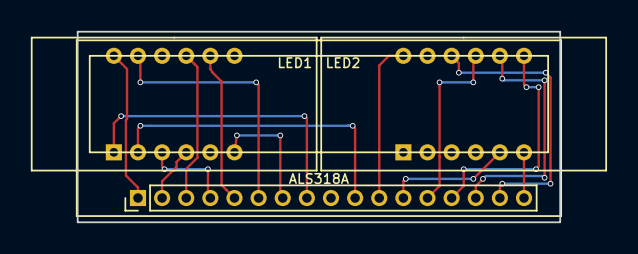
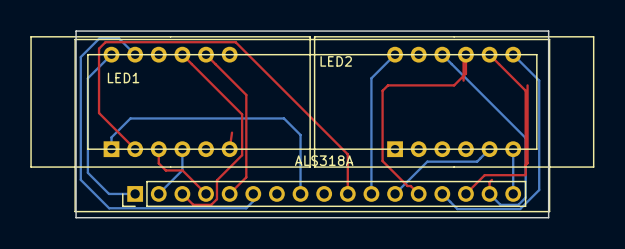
top track: (113, 55) (127, 68) (125, 175) (137, 187) (137, 198) -> none
bottom track: none -> (111, 54) (87, 78) (87, 172) (109, 193) (135, 193)
top track: (137, 55) (140, 58) (140, 82) -> none
bottom track: none -> (135, 54) (118, 38) (99, 38) (80, 57) (80, 179) (109, 208) (246, 208) (253, 201) (253, 193)
top track: (210, 55) (210, 69) (221, 81) (221, 184) -> (193, 65) (242, 114) (242, 155) (216, 180)
top track: none -> (206, 54) (246, 94) (246, 177) (232, 191)
top track: (403, 55) (388, 55) (379, 65) (379, 198) -> none
bottom track: none -> (395, 54) (371, 78) (371, 193)
top track: (451, 55) (458, 63) (458, 72) -> none
bottom track: none -> (442, 54) (525, 138) (525, 197) (518, 204) (500, 204) (489, 193)
top track: (524, 55) (524, 84) (526, 87) -> none
bottom track: none -> (513, 54) (539, 80) (539, 190) (520, 209) (457, 209) (442, 193)
top track: (502, 58) (502, 78) -> none
LED1 name position: LED1 (295, 62) -> LED1 (123, 77)
top track: (197, 66) (197, 157) (186, 168) (186, 198) -> none
bottom track: (458, 72) (545, 72) -> none
via: (458, 72) -> none
top track: (545, 72) (550, 77) (550, 183) -> none
via: (545, 72) -> none
bottom track: (502, 78) (503, 80) (544, 80) -> none
via: (502, 78) -> none
top track: (544, 80) (544, 177) -> none
via: (544, 80) -> none
bottom track: (140, 82) (256, 82) -> none
via: (140, 82) -> none
top track: (256, 82) (258, 84) (258, 198) -> none
via: (256, 82) -> none
top track: (439, 82) (439, 185) (427, 198) -> (465, 54) (465, 73) (454, 85) (387, 85) (382, 90) (382, 161) (407, 186) (410, 186) (418, 193)
bottom track: (439, 82) (473, 82) -> none
via: (439, 82) -> none
via: (473, 82) -> none
bottom track: (526, 87) (538, 87) -> none
via: (526, 87) -> none
via: (538, 87) -> none
top track: (121, 116) (113, 123) (113, 152) -> none
bottom track: (121, 116) (304, 116) -> none
via: (121, 116) -> none
top track: (304, 116) (306, 118) (306, 198) -> none
via: (304, 116) -> none
top track: (140, 125) (137, 128) (137, 152) -> none
bottom track: (140, 125) (352, 125) -> none
via: (140, 125) -> none
top track: (352, 125) (355, 128) (355, 157) -> (135, 149) (99, 113) (99, 48) (105, 42) (235, 42) (347, 154)
via: (352, 125) -> none
bottom track: (236, 135) (280, 135) -> none
via: (236, 135) -> none
top track: (280, 135) (280, 195) (282, 198) -> none
via: (280, 135) -> none
bottom track: none -> (111, 149) (111, 137) (130, 118) (284, 118) (300, 135) (300, 193)
top track: (186, 152) (176, 161) (176, 166) (162, 181) (162, 198) -> none
bottom track: none -> (182, 149) (182, 170) (158, 193)
top track: (499, 152) (473, 178) -> none
bottom track: none -> (489, 149) (477, 161) (427, 161) (395, 193)
top track: (524, 152) (524, 198) -> none
bottom track: none -> (513, 149) (513, 193)
bottom track: (164, 169) (207, 169) -> none
via: (164, 169) -> none
top track: (207, 169) (207, 195) -> (161, 165) (165, 170) (182, 170) (203, 191)
via: (207, 169) -> none
top track: (463, 169) (463, 185) (451, 198) -> none
bottom track: (463, 169) (536, 169) -> none
via: (463, 169) -> none
via: (536, 169) -> none
bottom track: (544, 177) (542, 176) (485, 176) (482, 178) -> none
via: (544, 177) -> none
part value position: ALS318A (318, 178) -> ALS318A (324, 160)
top track: (405, 178) (403, 181) (403, 198) -> none
bottom track: (405, 178) (473, 178) -> none
via: (405, 178) -> none
via: (473, 178) -> none
top track: (482, 178) (475, 186) (475, 198) -> (491, 57) (525, 90) (525, 174) (484, 175) (465, 193)
via: (482, 178) -> none
bottom track: (502, 183) (550, 183) -> none
via: (502, 183) -> none
via: (550, 183) -> none
top track: (221, 185) (234, 198) -> (216, 181) (216, 199) (211, 204) (193, 204) (182, 193)

